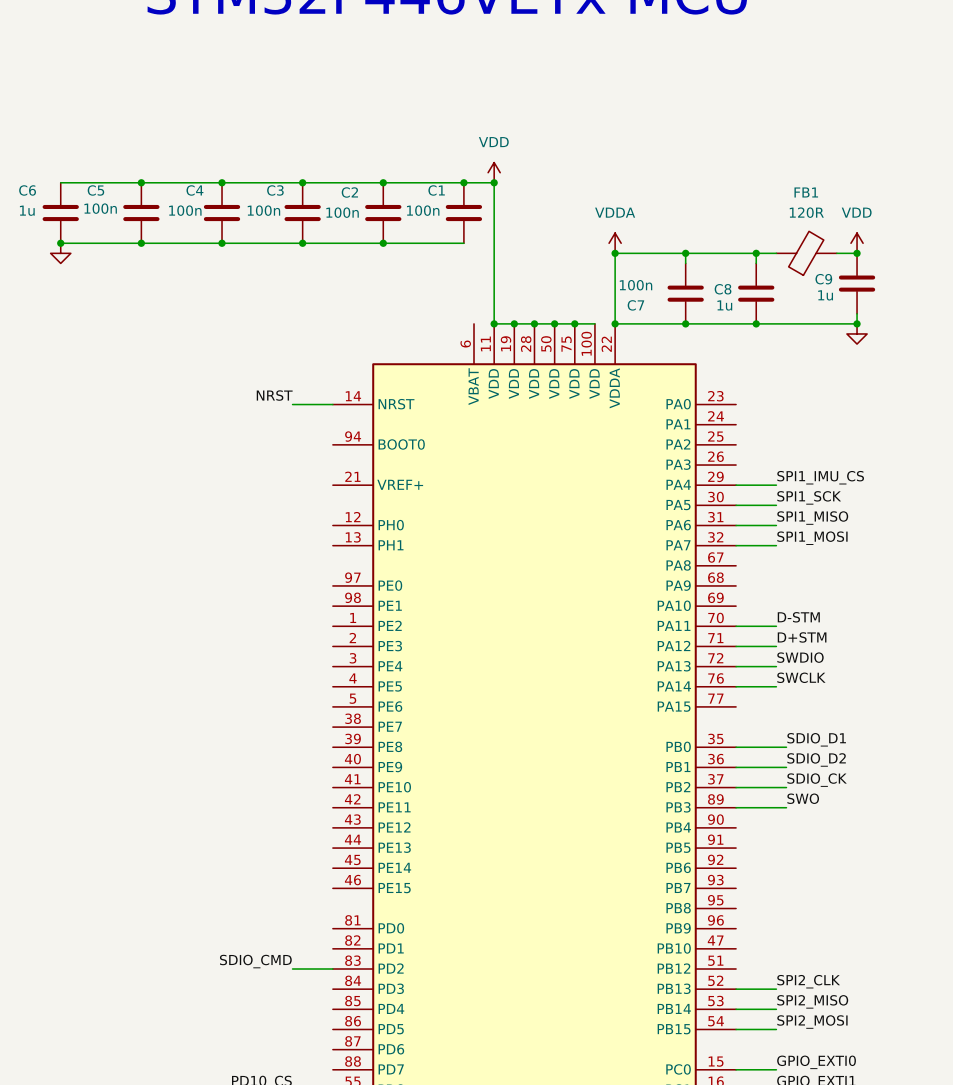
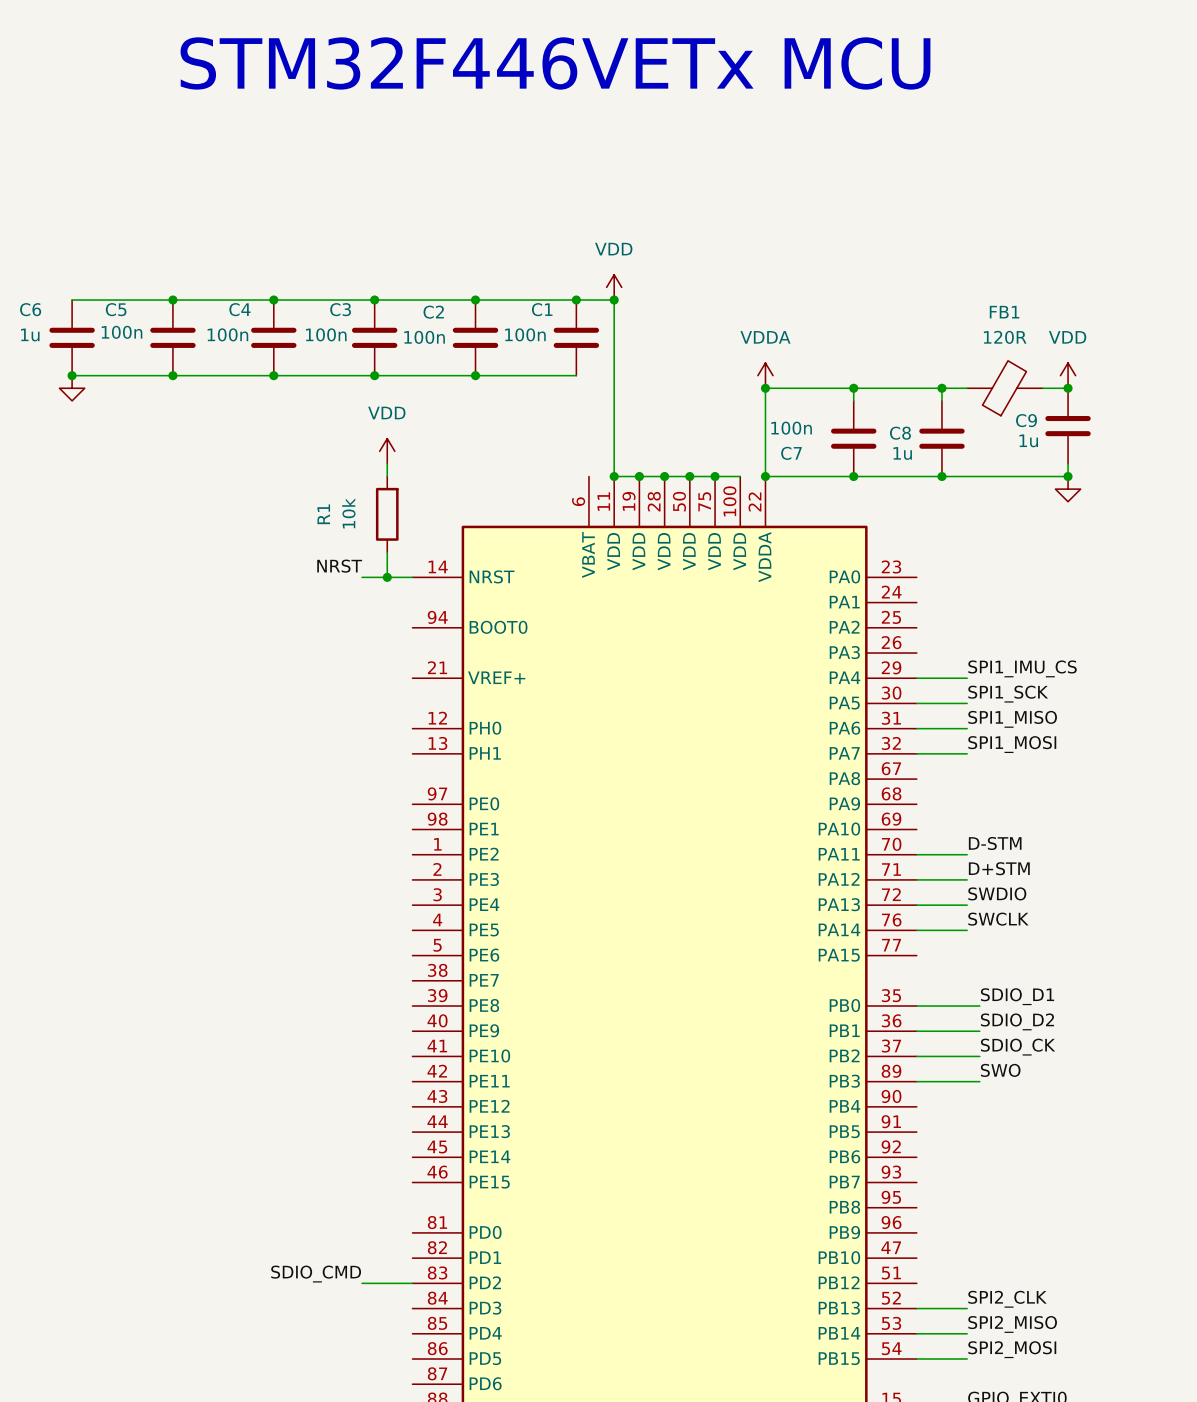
power symbol: none -> VDD (387, 451)
wire: none -> (387, 463) (387, 476)
R1: none -> 10k (387, 514)
wire: none -> (387, 552) (387, 577)
junction: none -> (387, 577)

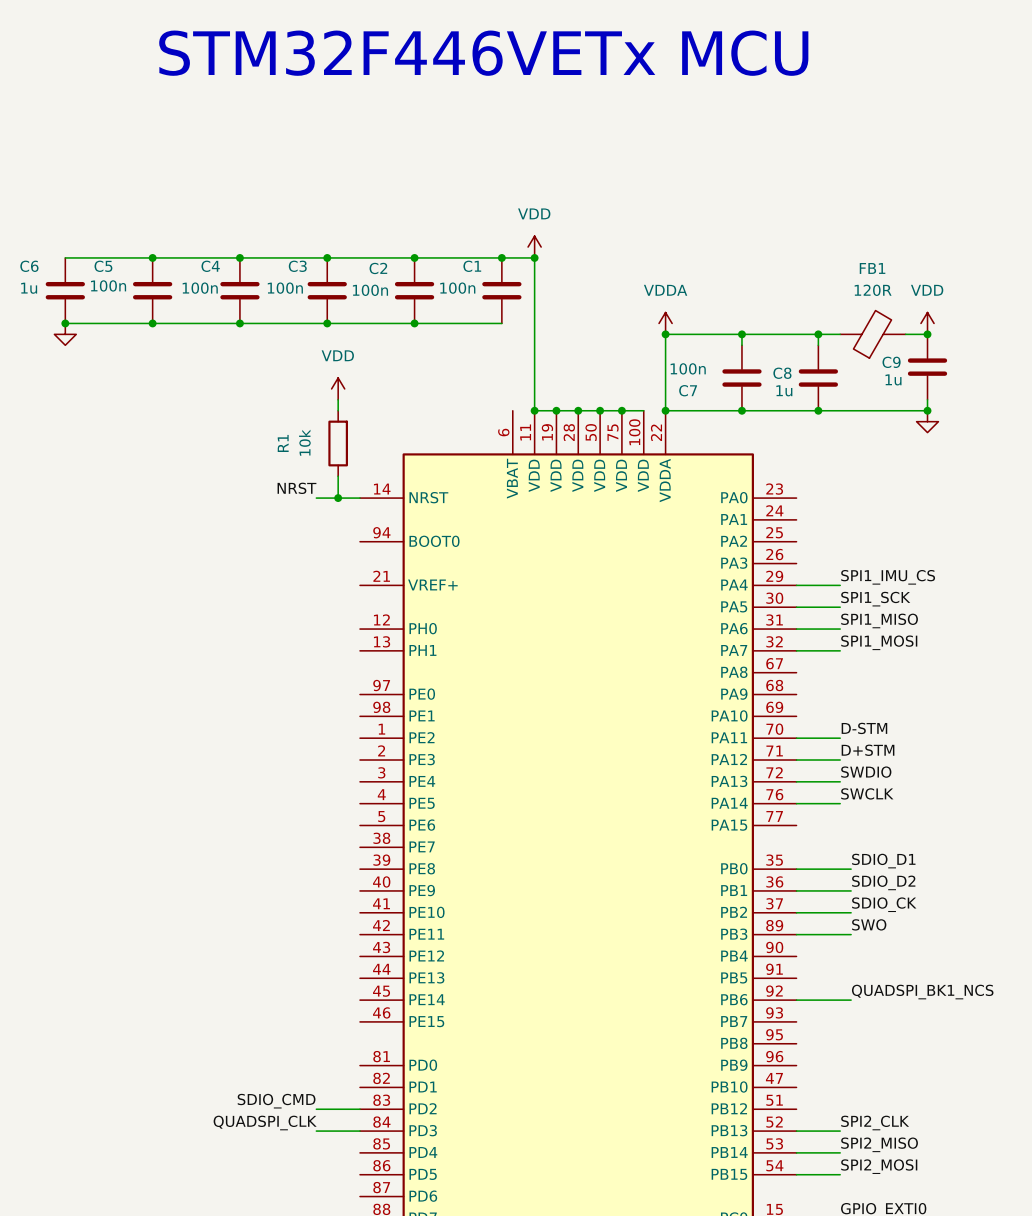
label: none -> QUADSPI_BK1_NCS (922, 992)
wire: none -> (796, 1000) (851, 1000)
label: none -> QUADSPI_CLK (265, 1122)
wire: none -> (316, 1131) (359, 1131)

